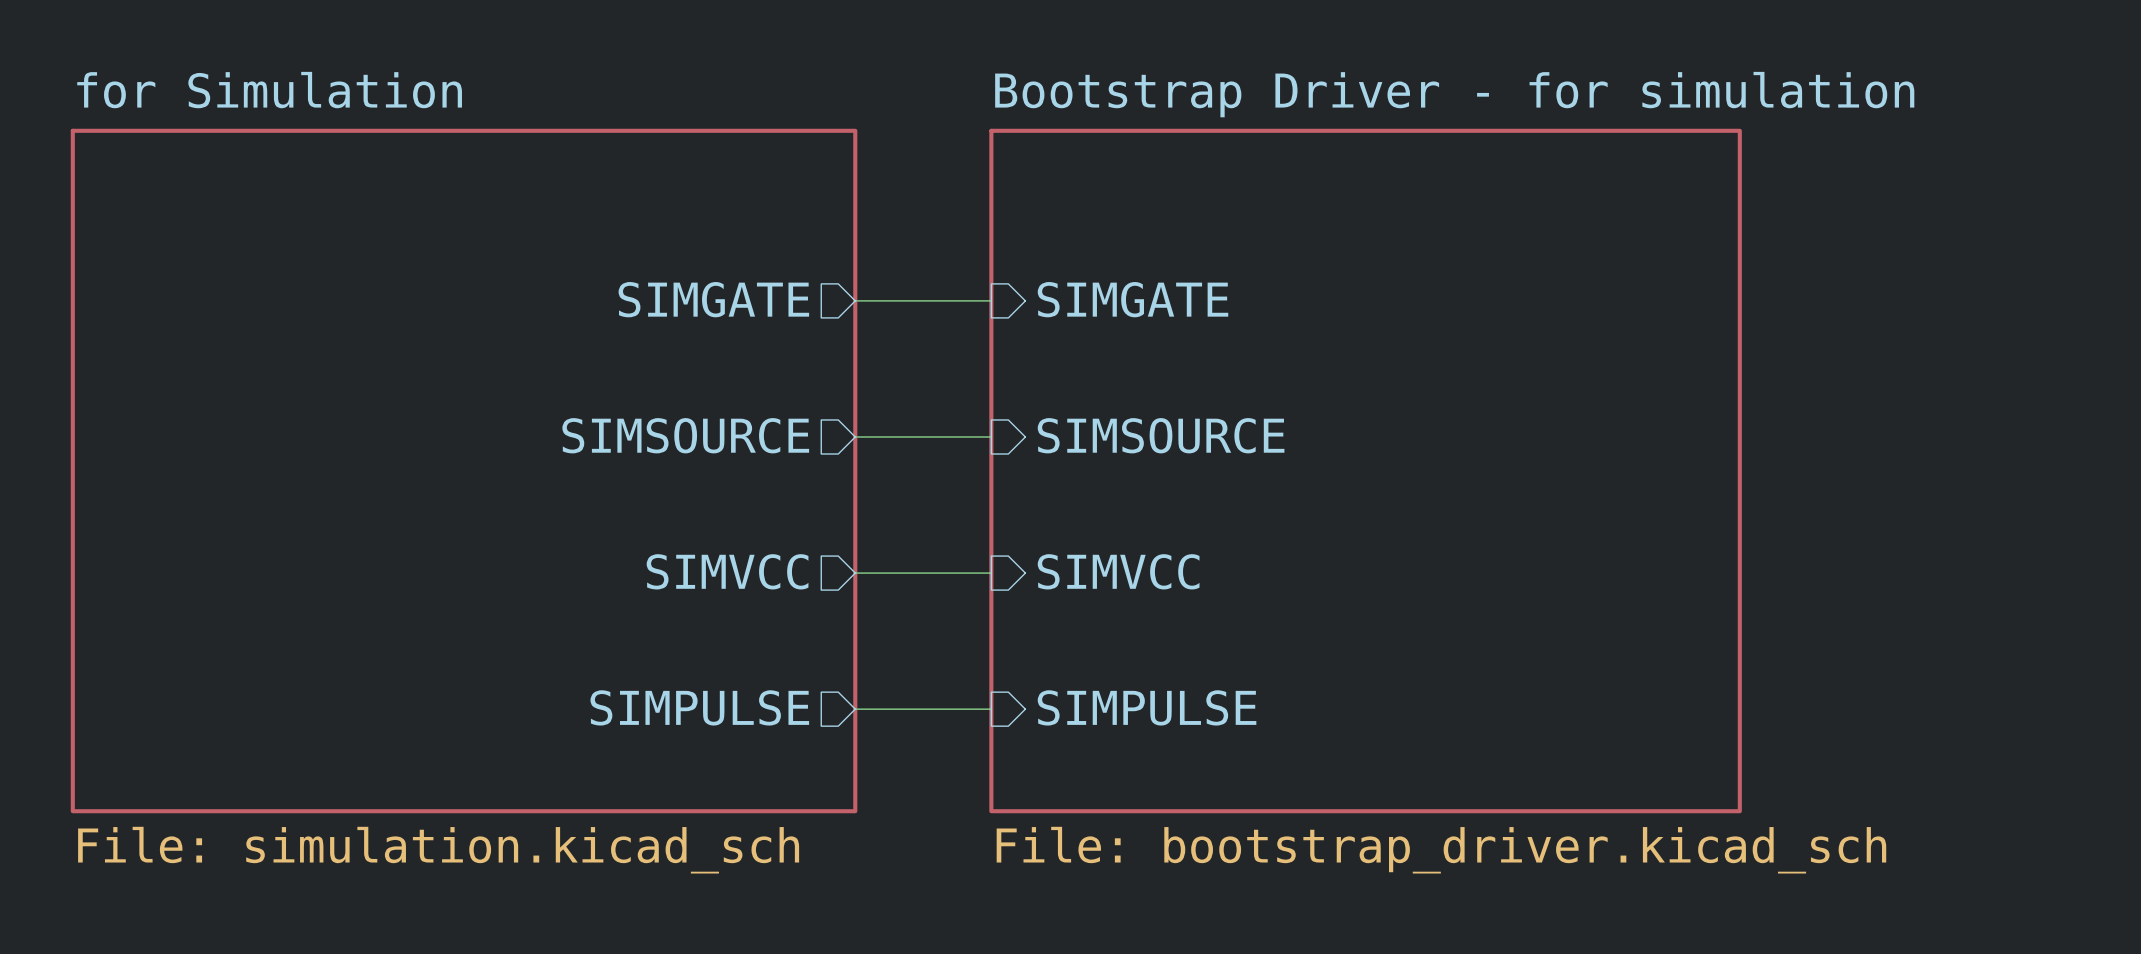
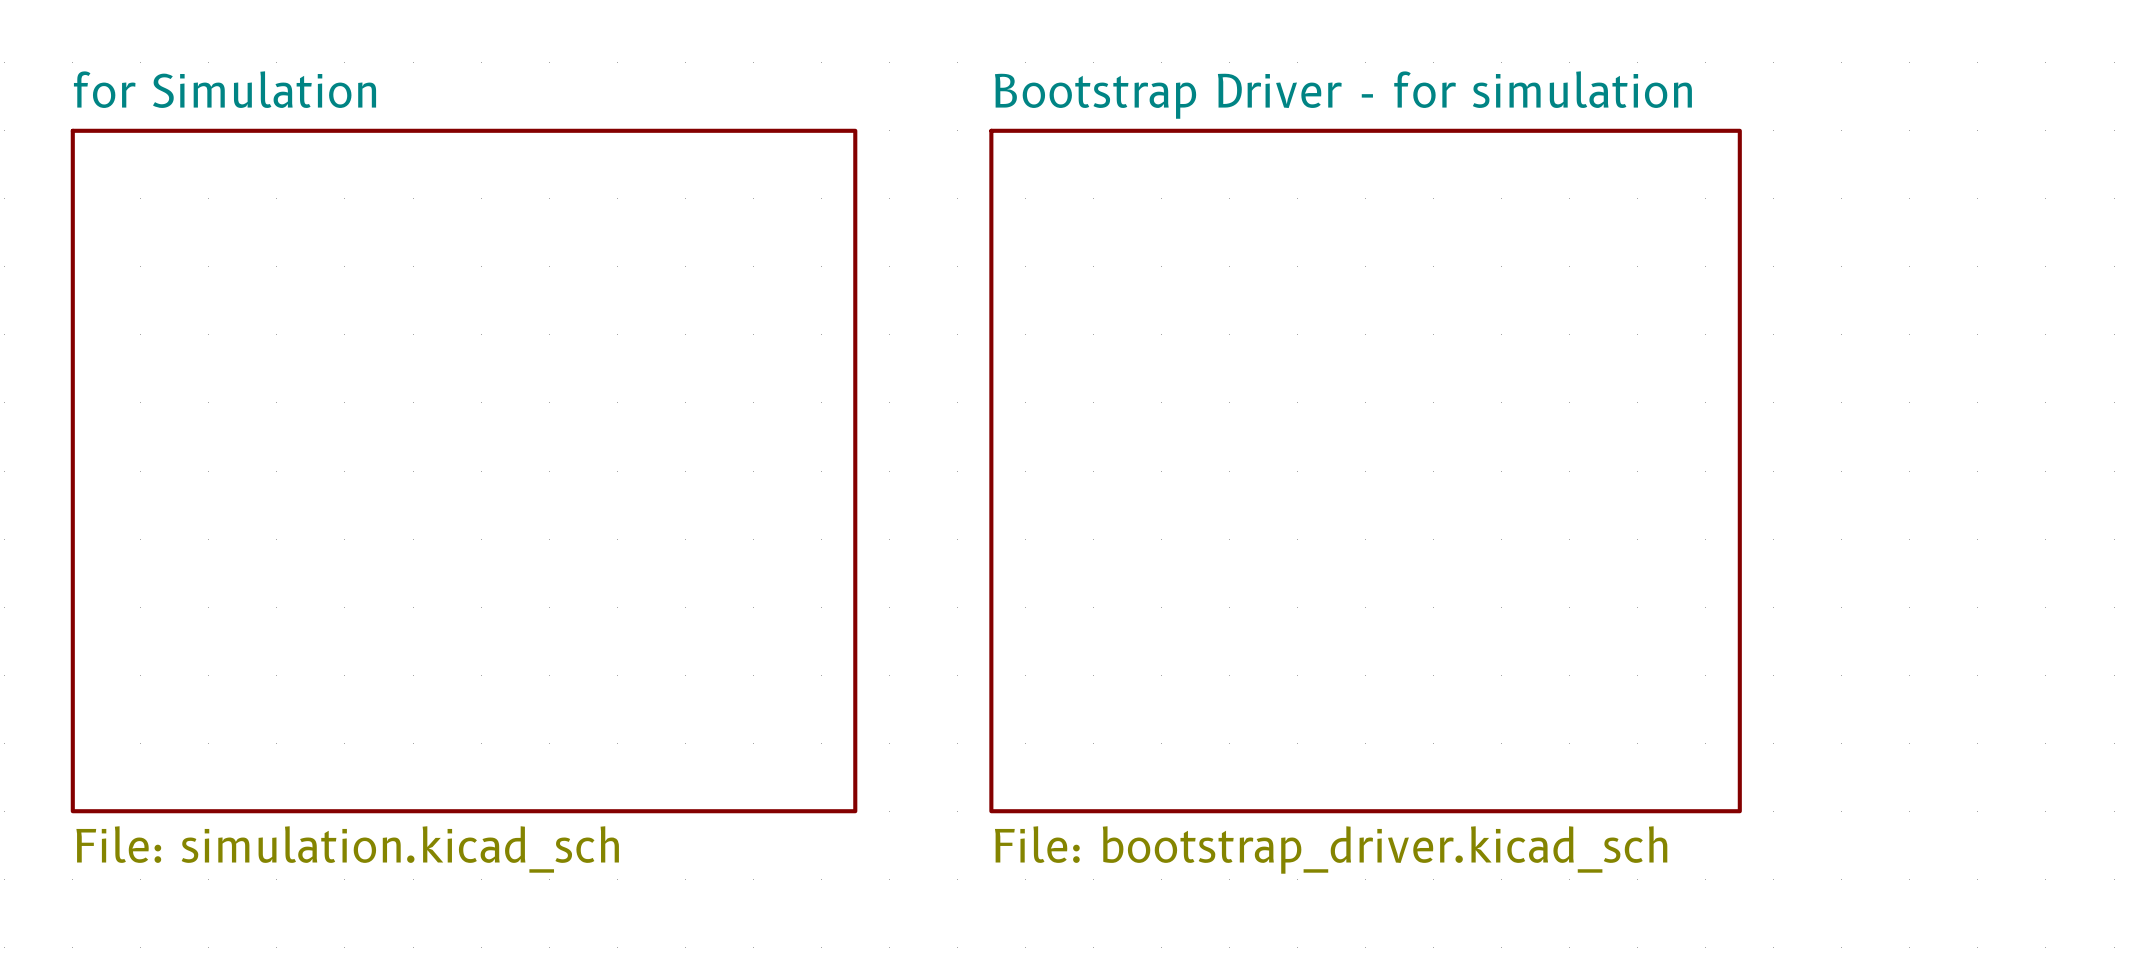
sheet pin: SIMGATE (713, 299) -> none
sheet pin: SIMGATE (1132, 299) -> none
wire: (855, 300) (991, 300) -> none
sheet pin: SIMSOURCE (685, 435) -> none
sheet pin: SIMSOURCE (1161, 435) -> none
wire: (855, 436) (991, 436) -> none
sheet pin: SIMVCC (727, 571) -> none
sheet pin: SIMVCC (1118, 571) -> none
wire: (855, 573) (991, 573) -> none
sheet pin: SIMPULSE (699, 707) -> none
sheet pin: SIMPULSE (1147, 707) -> none
wire: (855, 709) (991, 709) -> none

